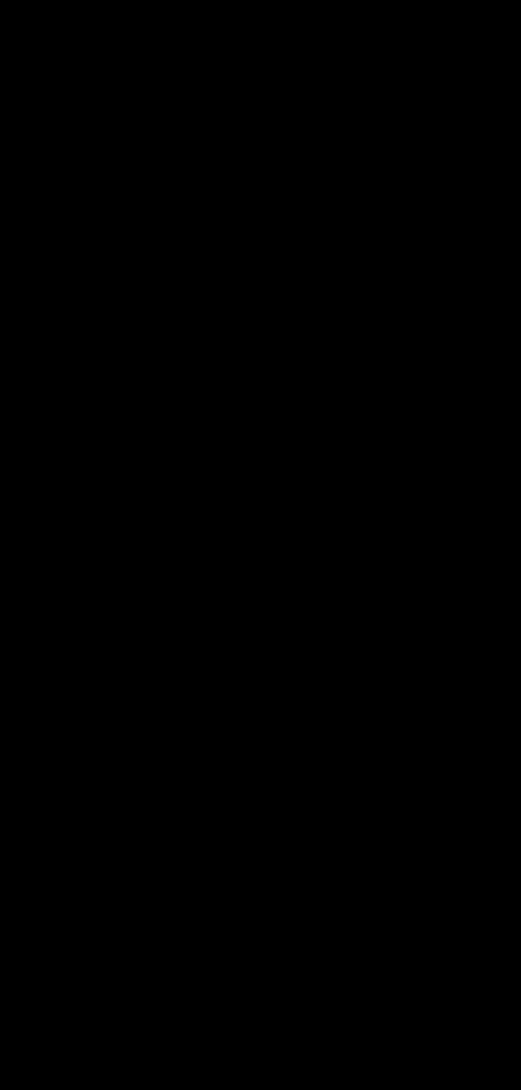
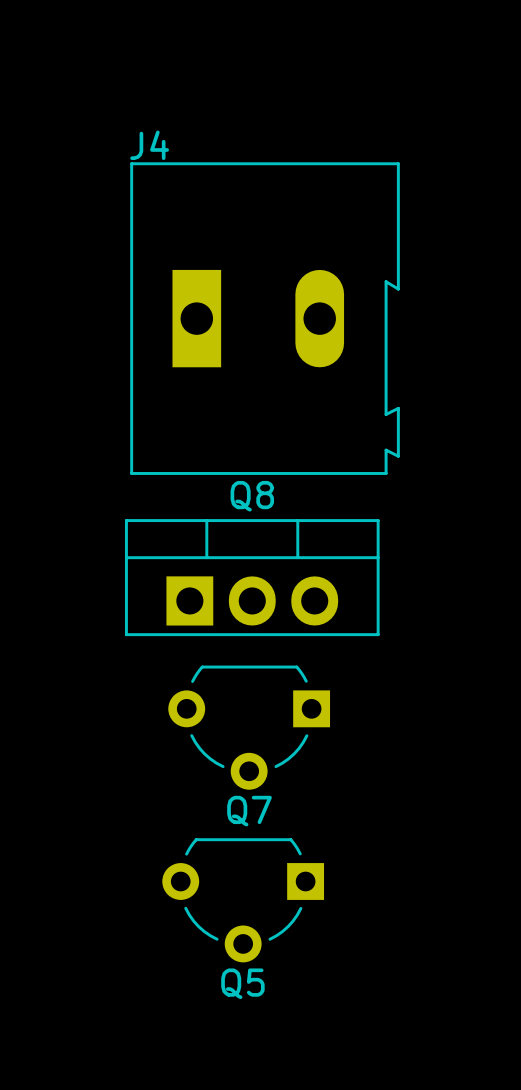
J4: none -> (265, 318)
Q8: none -> (252, 577)
Q7: none -> (249, 727)
Q5: none -> (243, 900)

